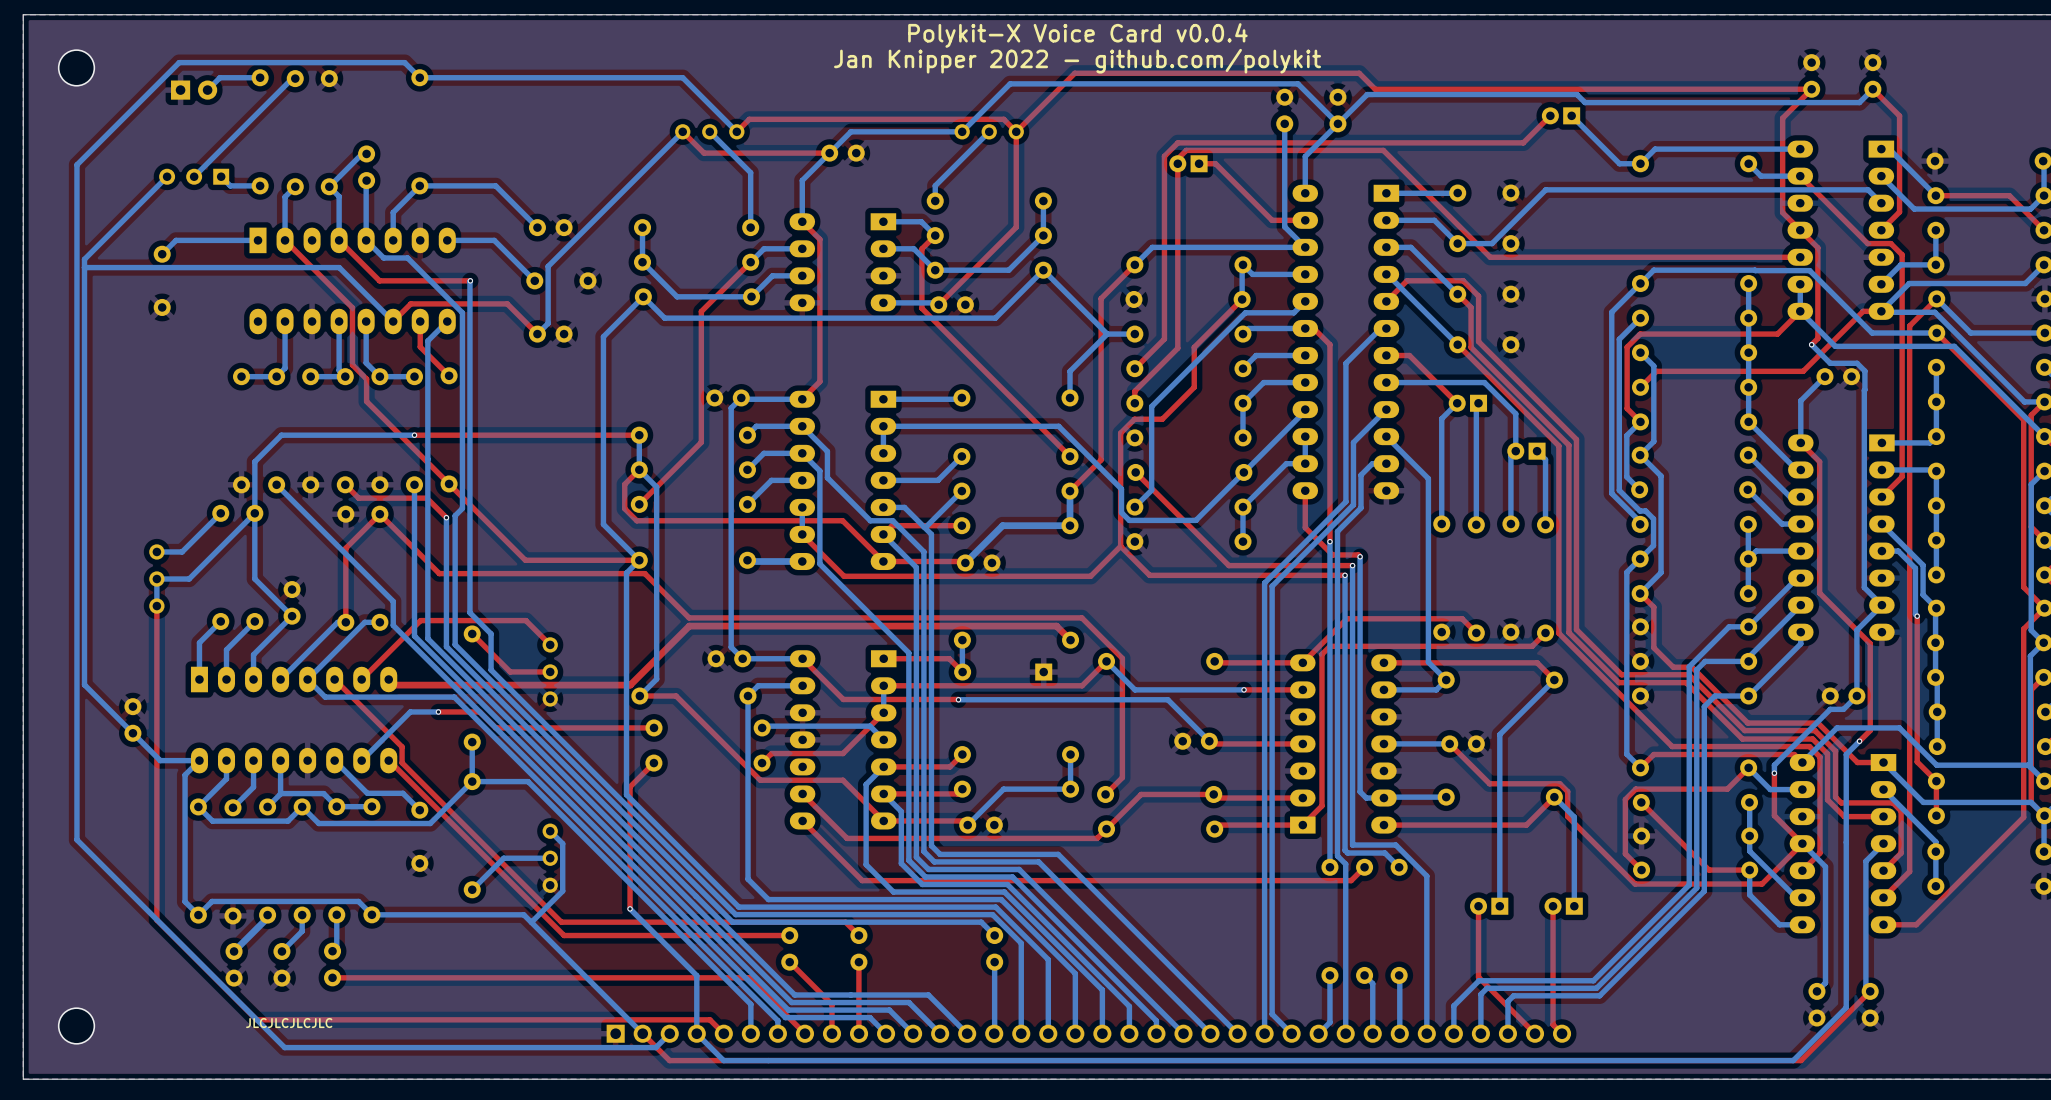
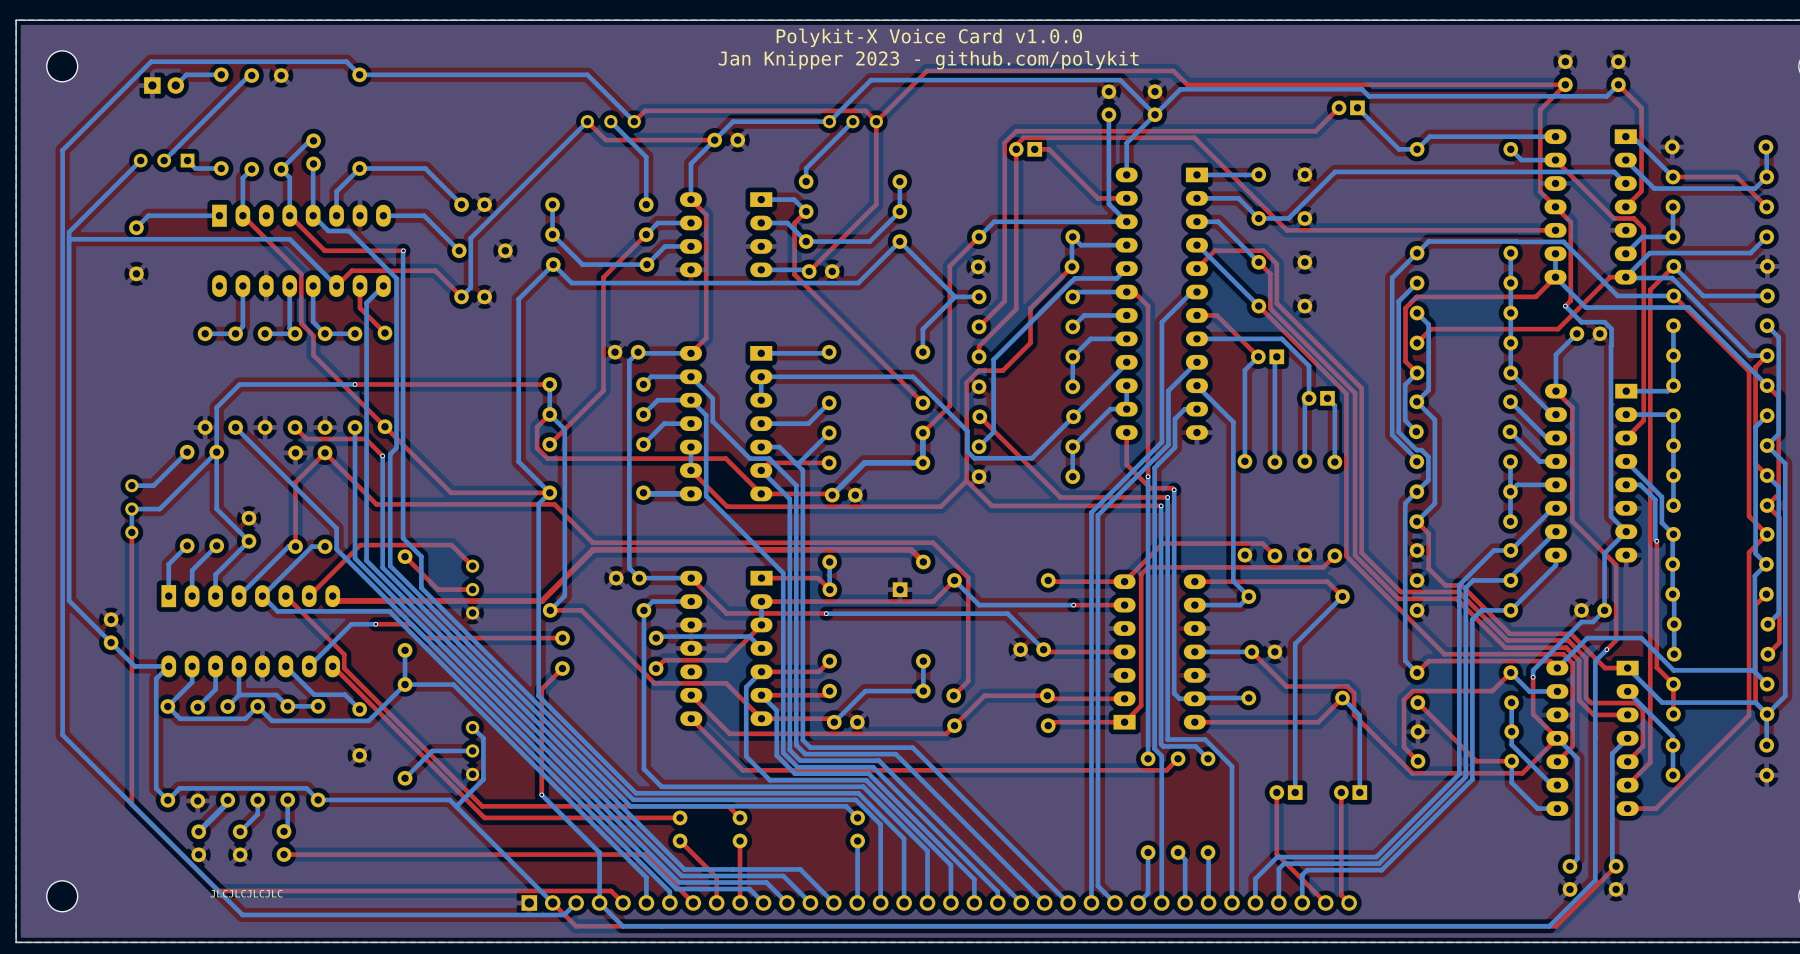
text: Polykit-X Voice Card v0.0.4 (1077, 35) -> Polykit-X Voice Card v1.0.0 (929, 37)
text: Jan Knipper 2022 - github.com/polykit (1077, 61) -> Jan Knipper 2023 - github.com/polykit (928, 60)

